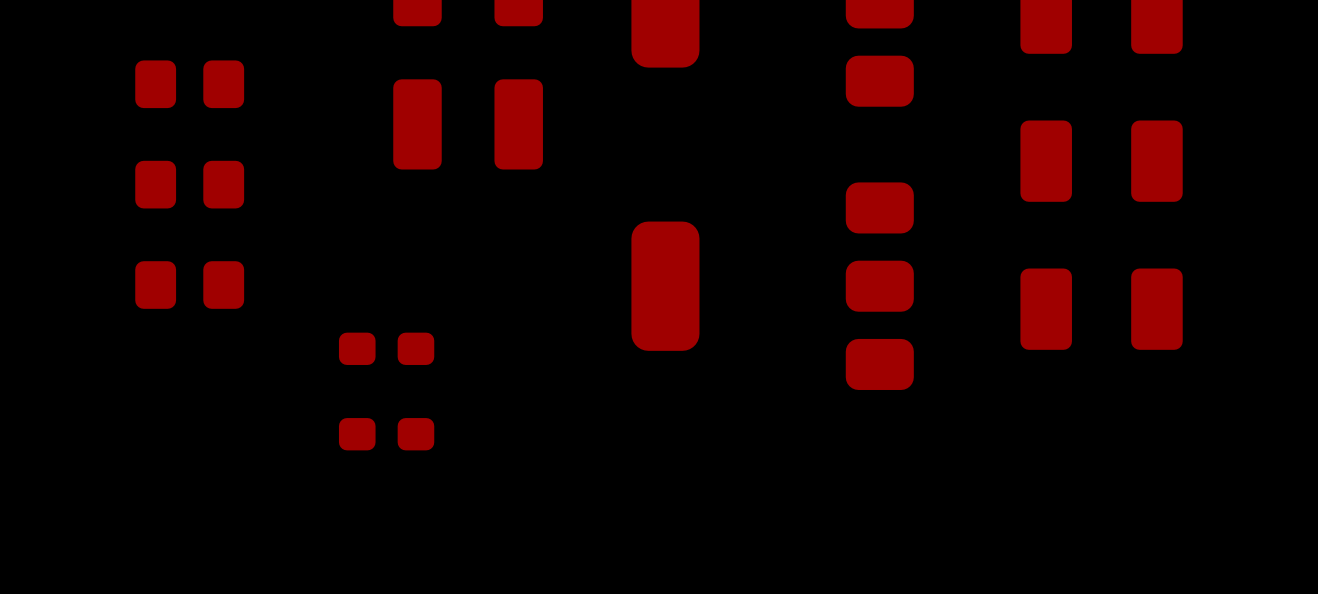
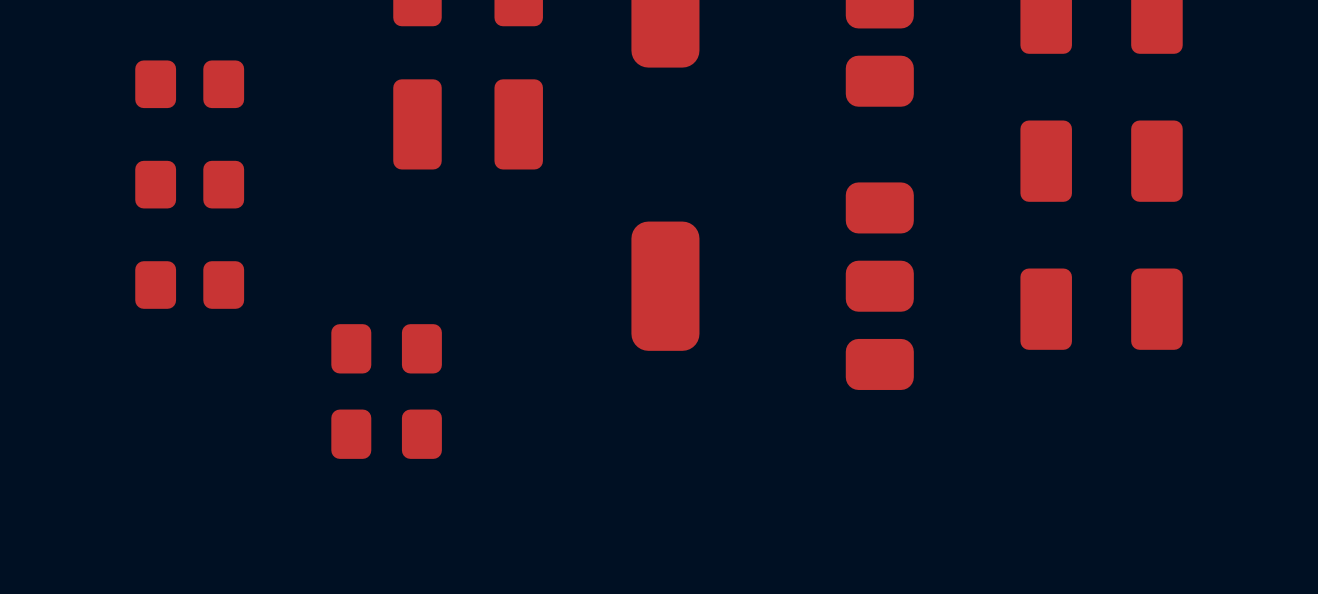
part footprint: [338, 332, 435, 365] -> [331, 324, 442, 374]
part footprint: [338, 418, 435, 451] -> [331, 409, 442, 459]

